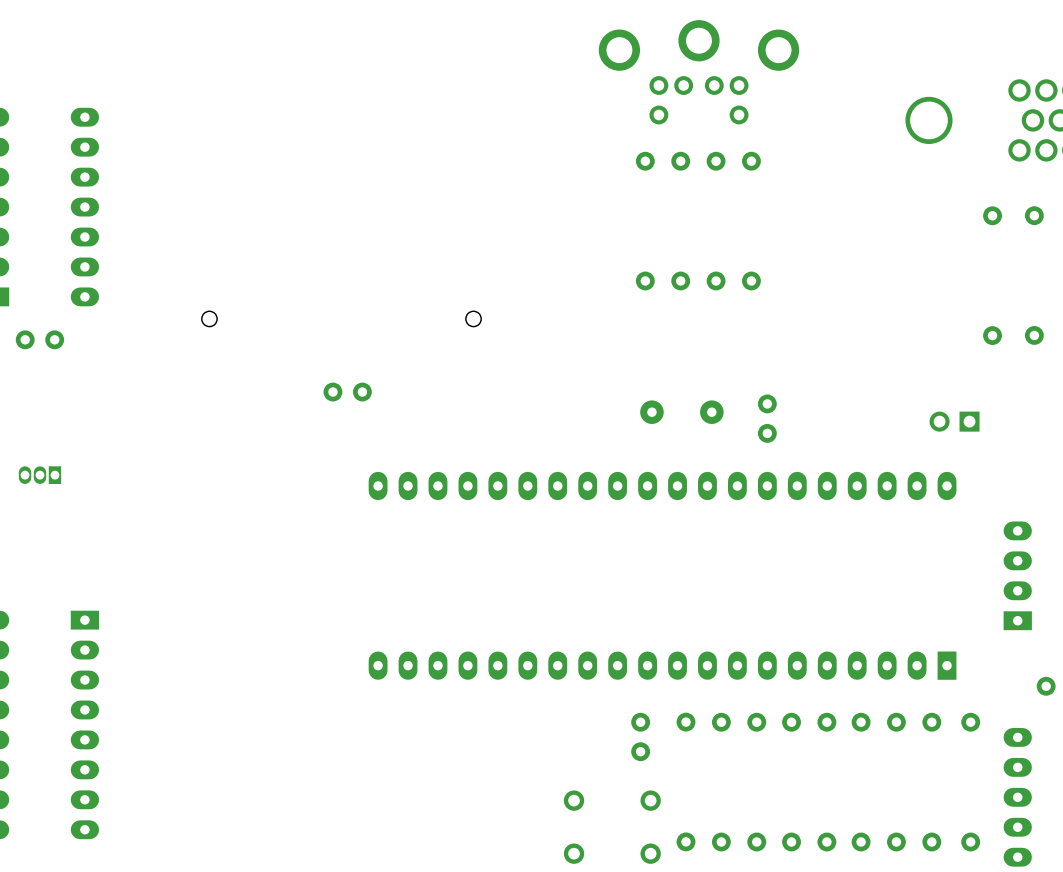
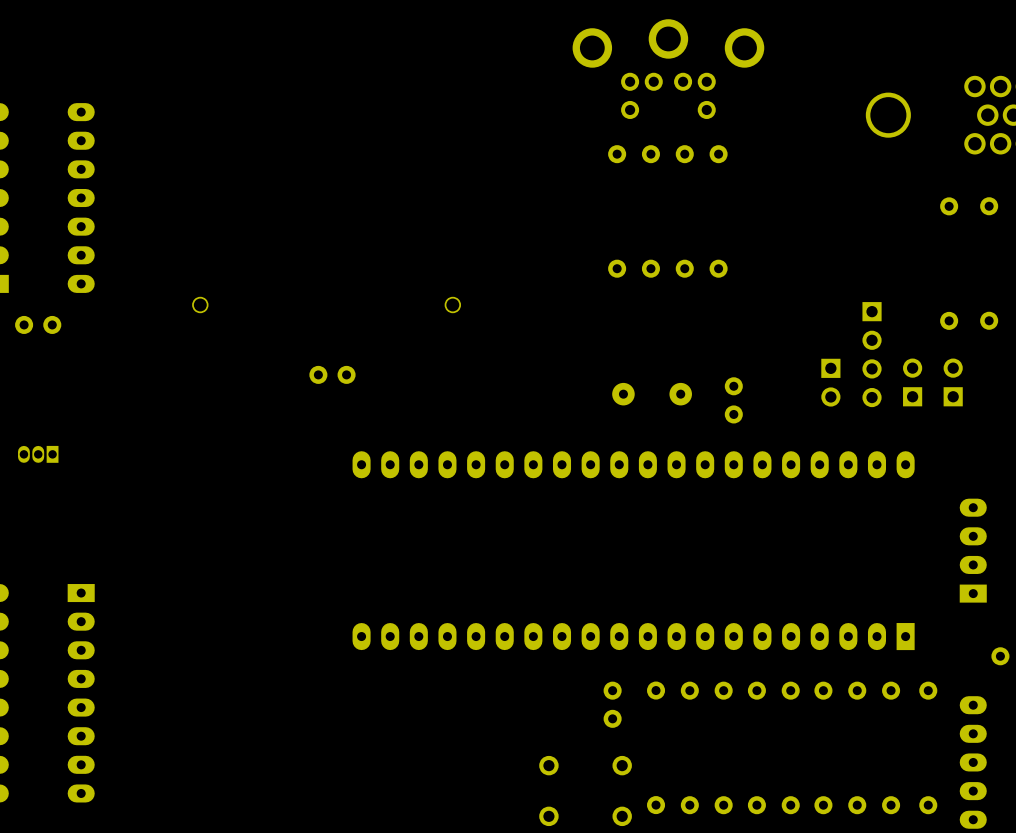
part: none -> (872, 354)
part: none -> (953, 382)
part: none -> (830, 382)
part rotation: 0° (954, 421) -> 90° clockwise (912, 382)

